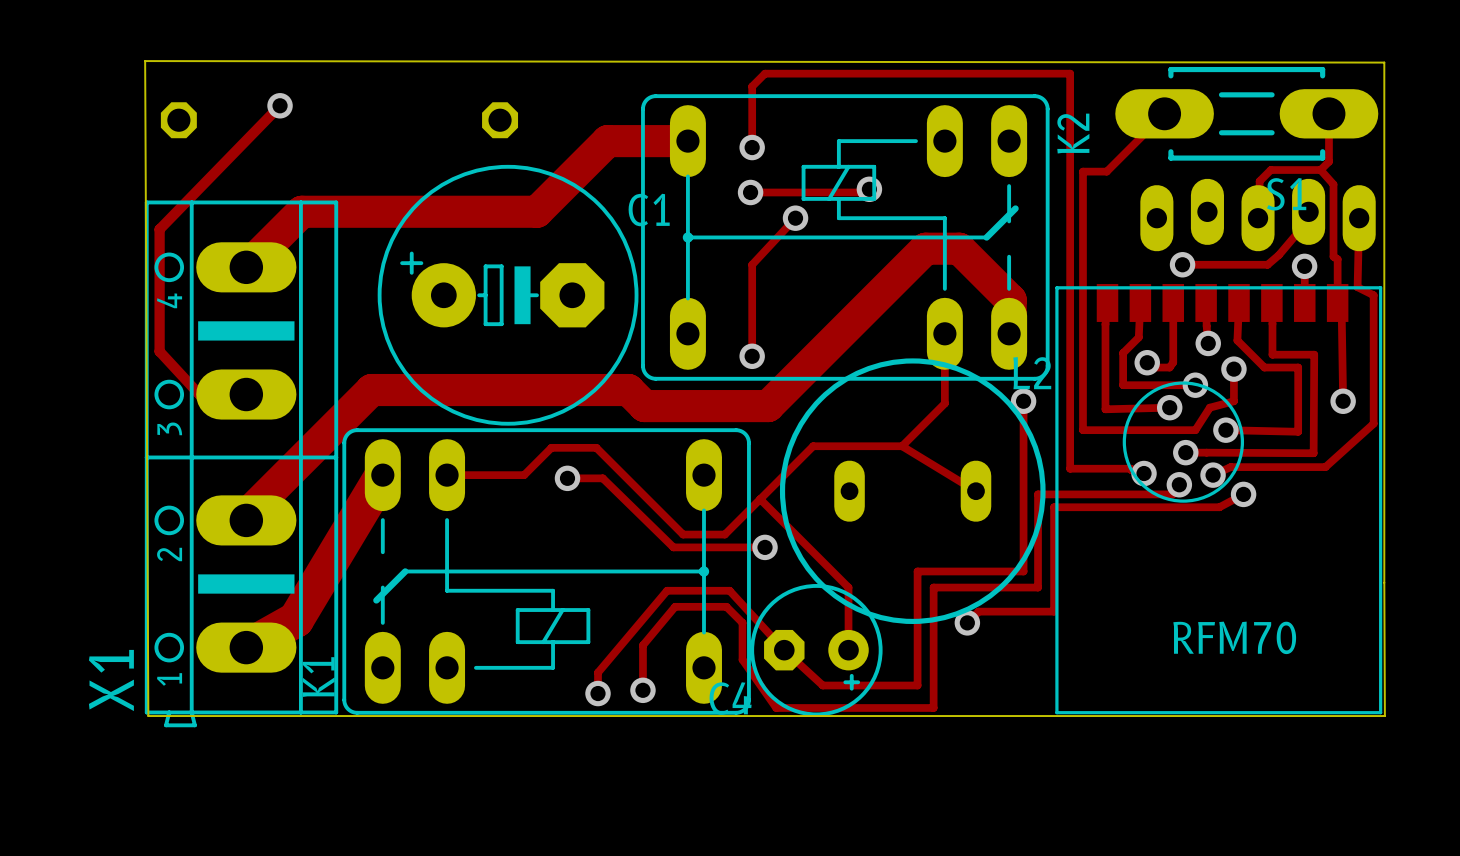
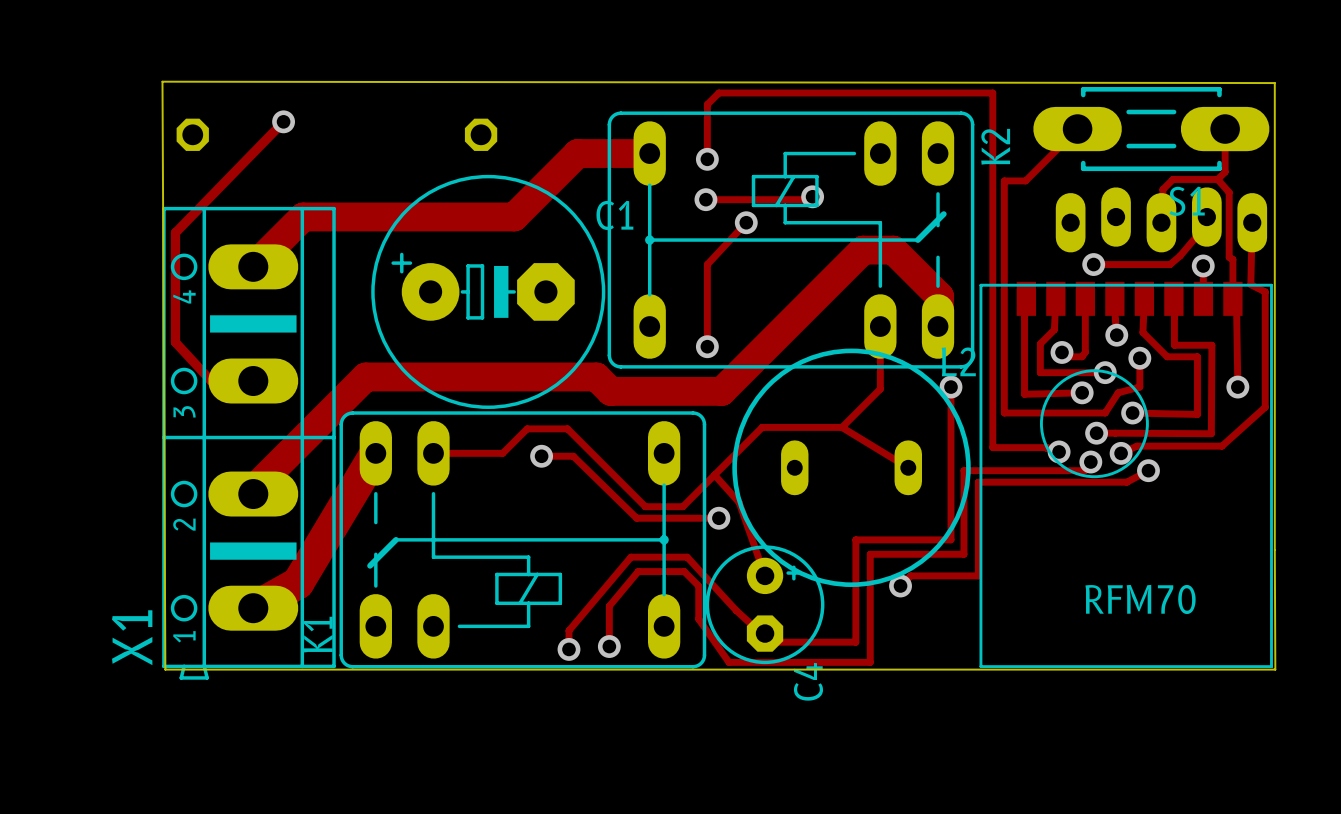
track: (760, 499) (848, 587) (848, 650) -> (714, 475) (739, 502) (765, 575)
C4 rotation: 0° (816, 650) -> 90° counterclockwise (765, 604)

